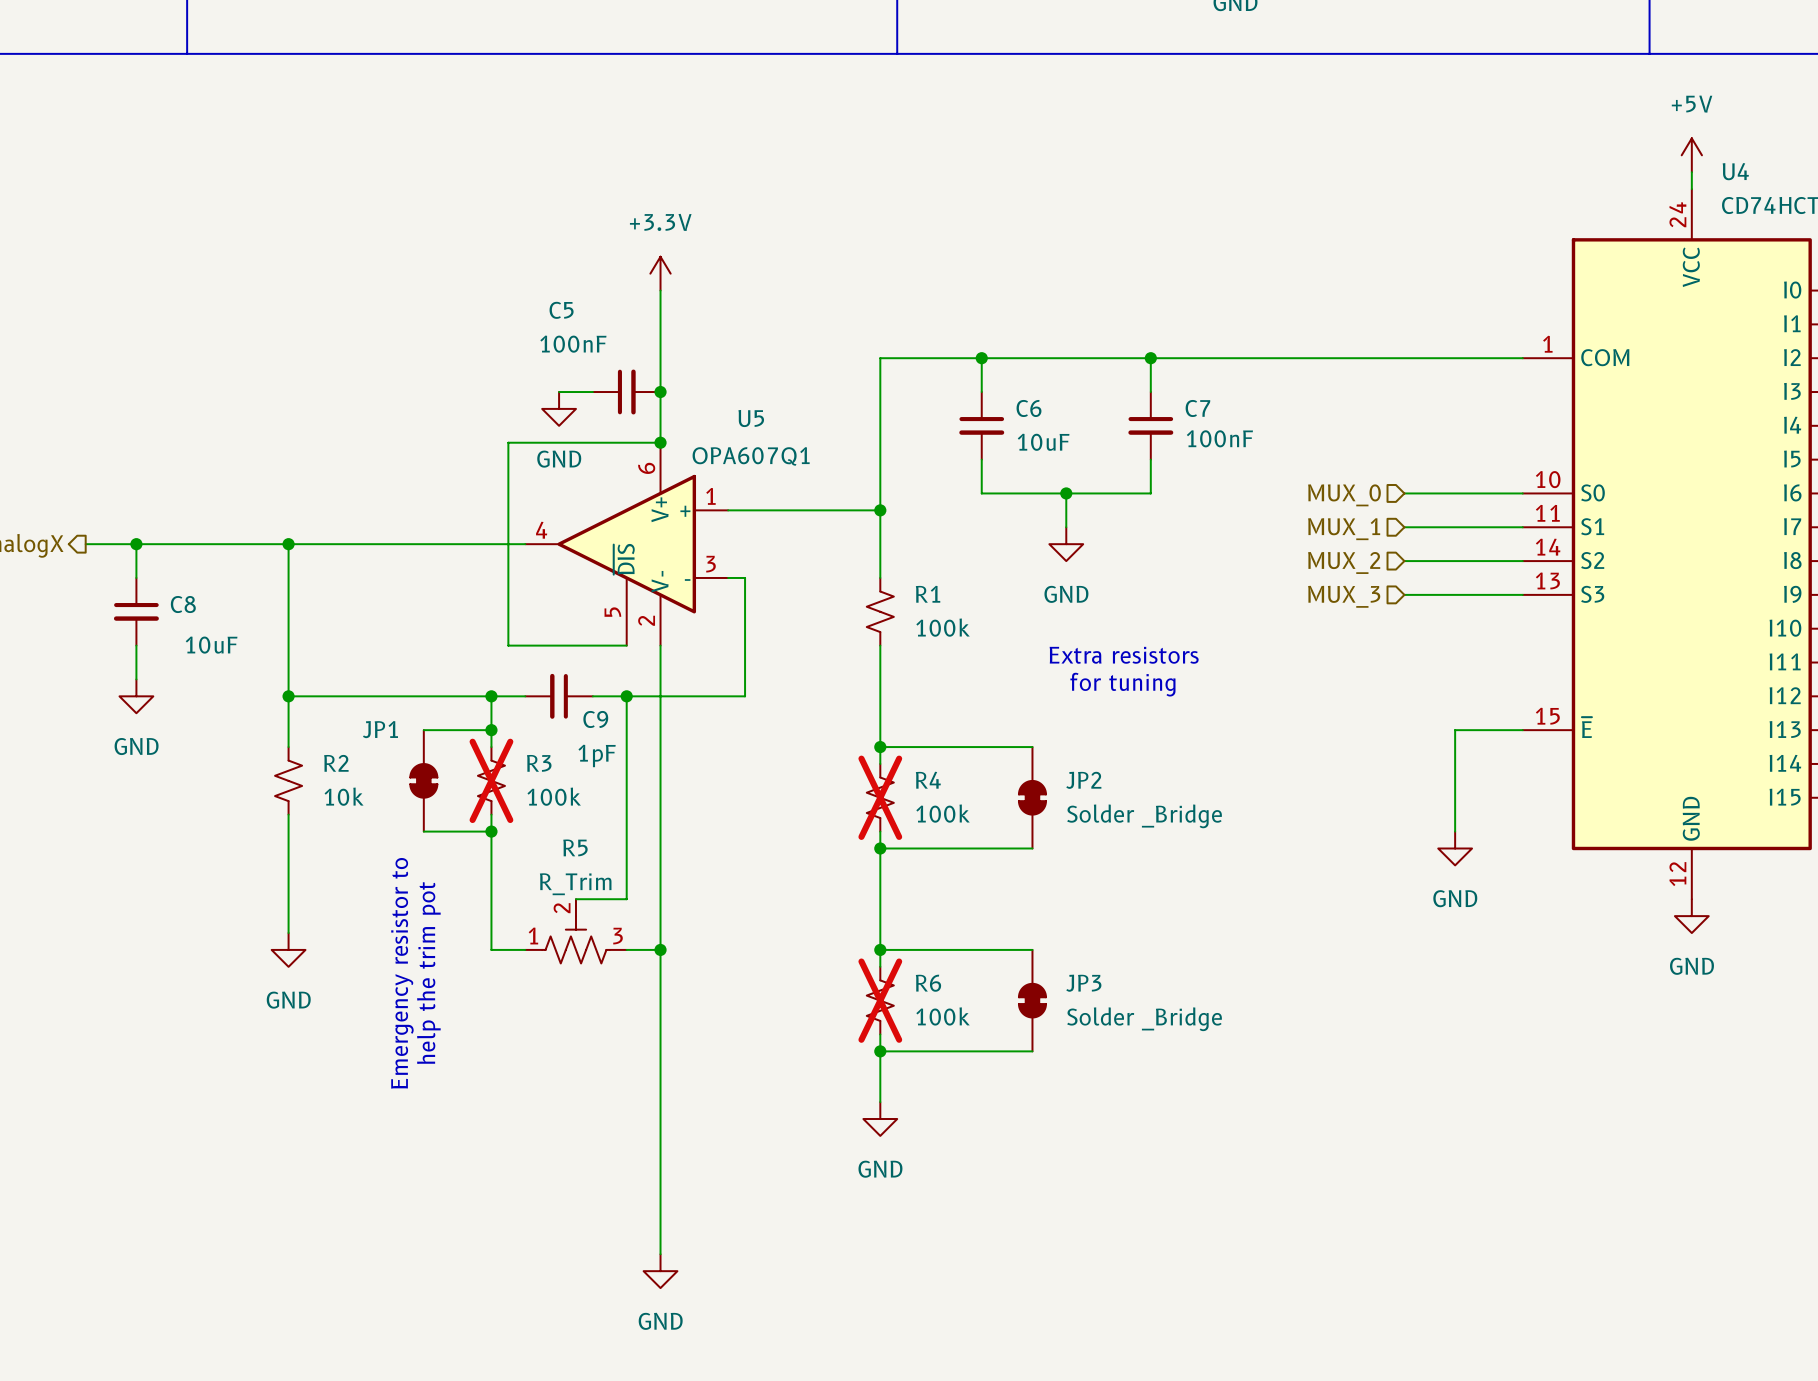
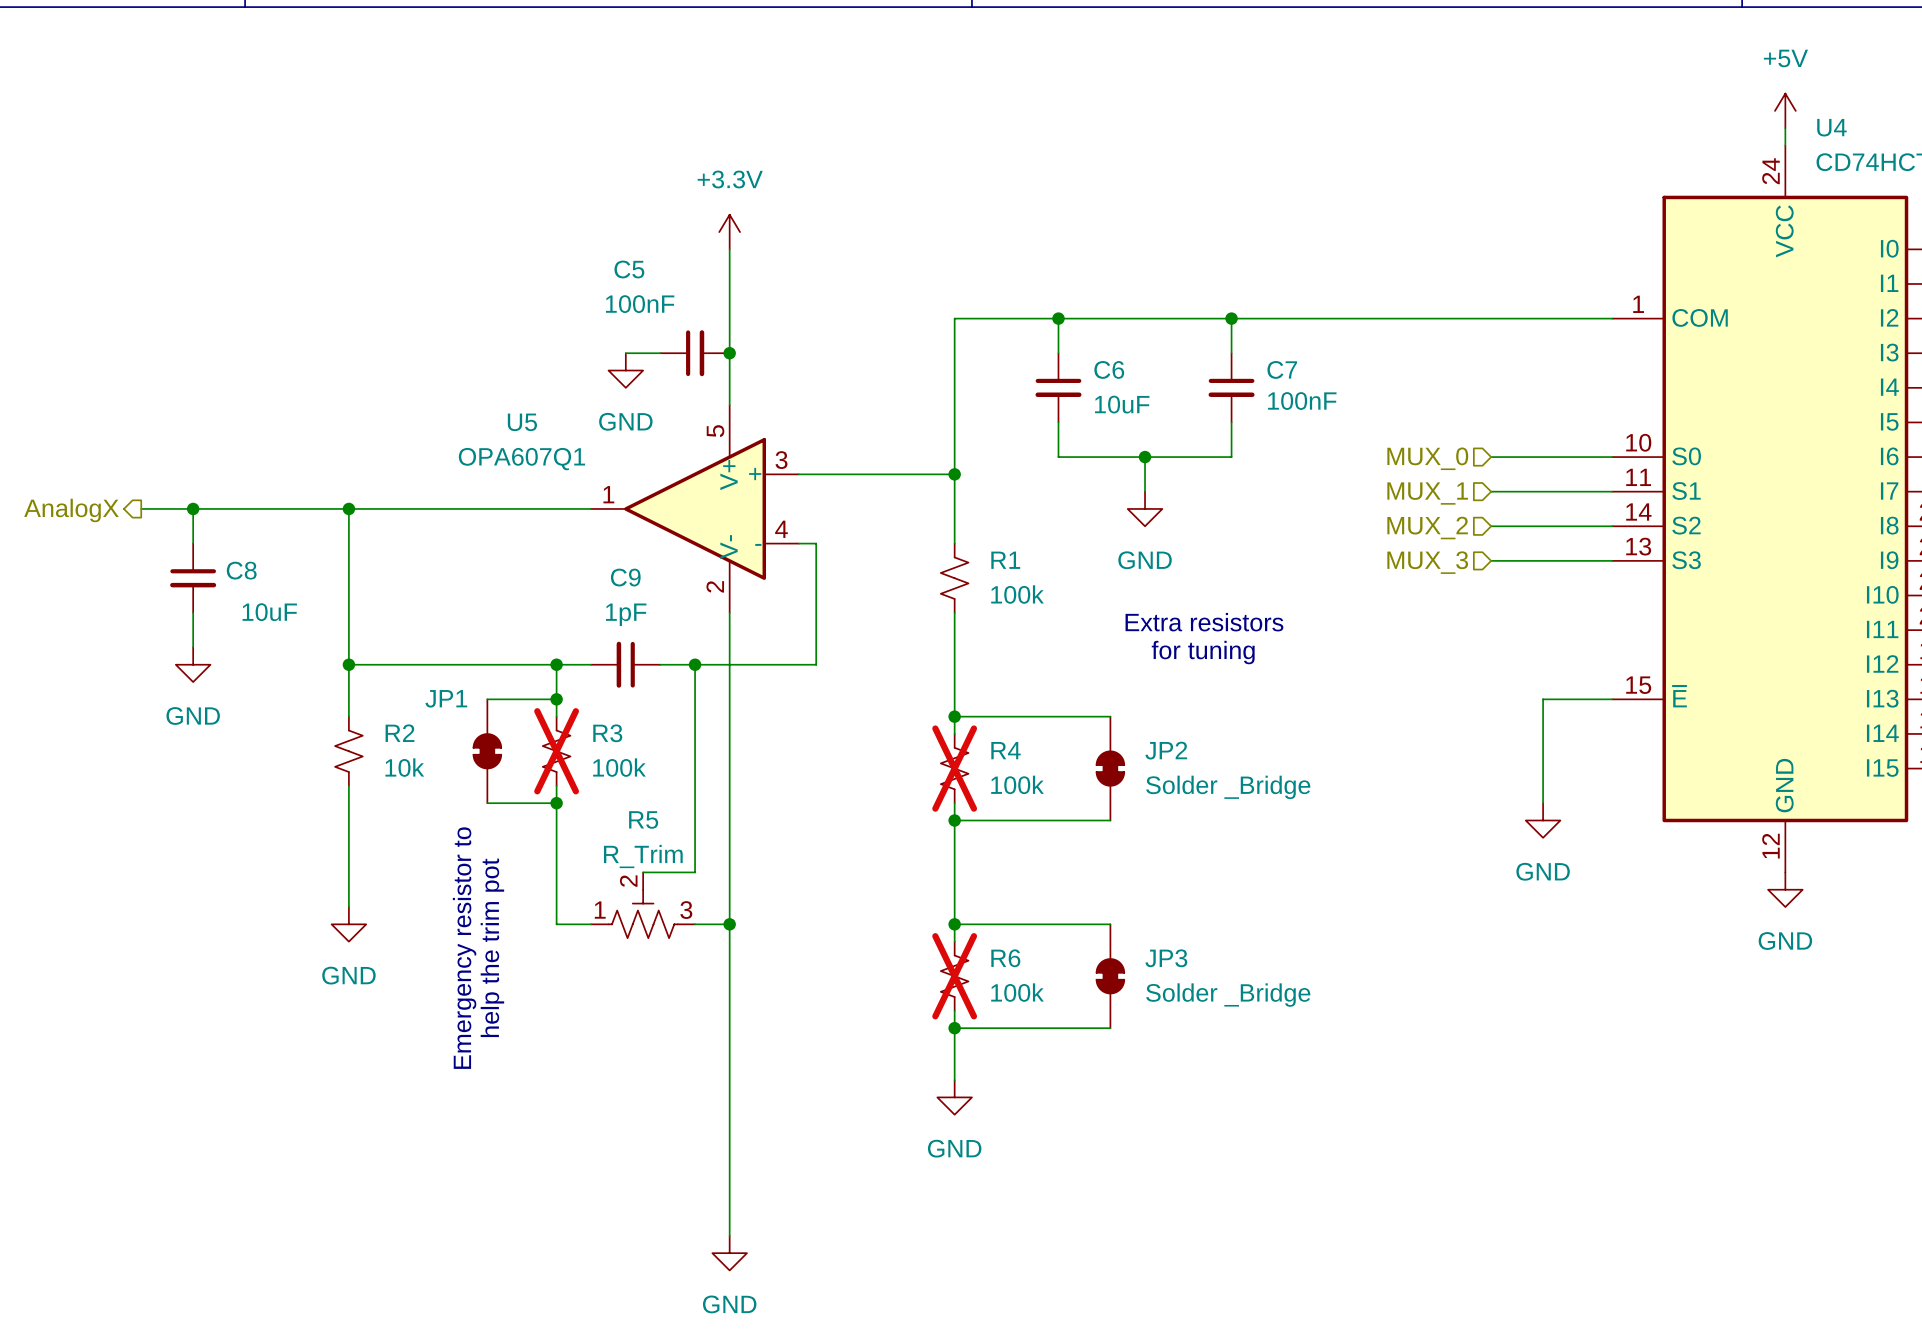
U5 name position: U5 (751, 418) -> U5 (522, 422)
U5 symbol: [525, 442, 729, 646] -> [591, 405, 799, 613]
wire: (660, 442) (508, 442) (508, 645) (626, 645) -> none
junction: (660, 442) -> none
U5 value position: OPA607Q1 (751, 456) -> OPA607Q1 (521, 459)
C9 name position: C9 (595, 719) -> C9 (625, 577)
C9 value position: 1pF (597, 755) -> 1pF (626, 614)

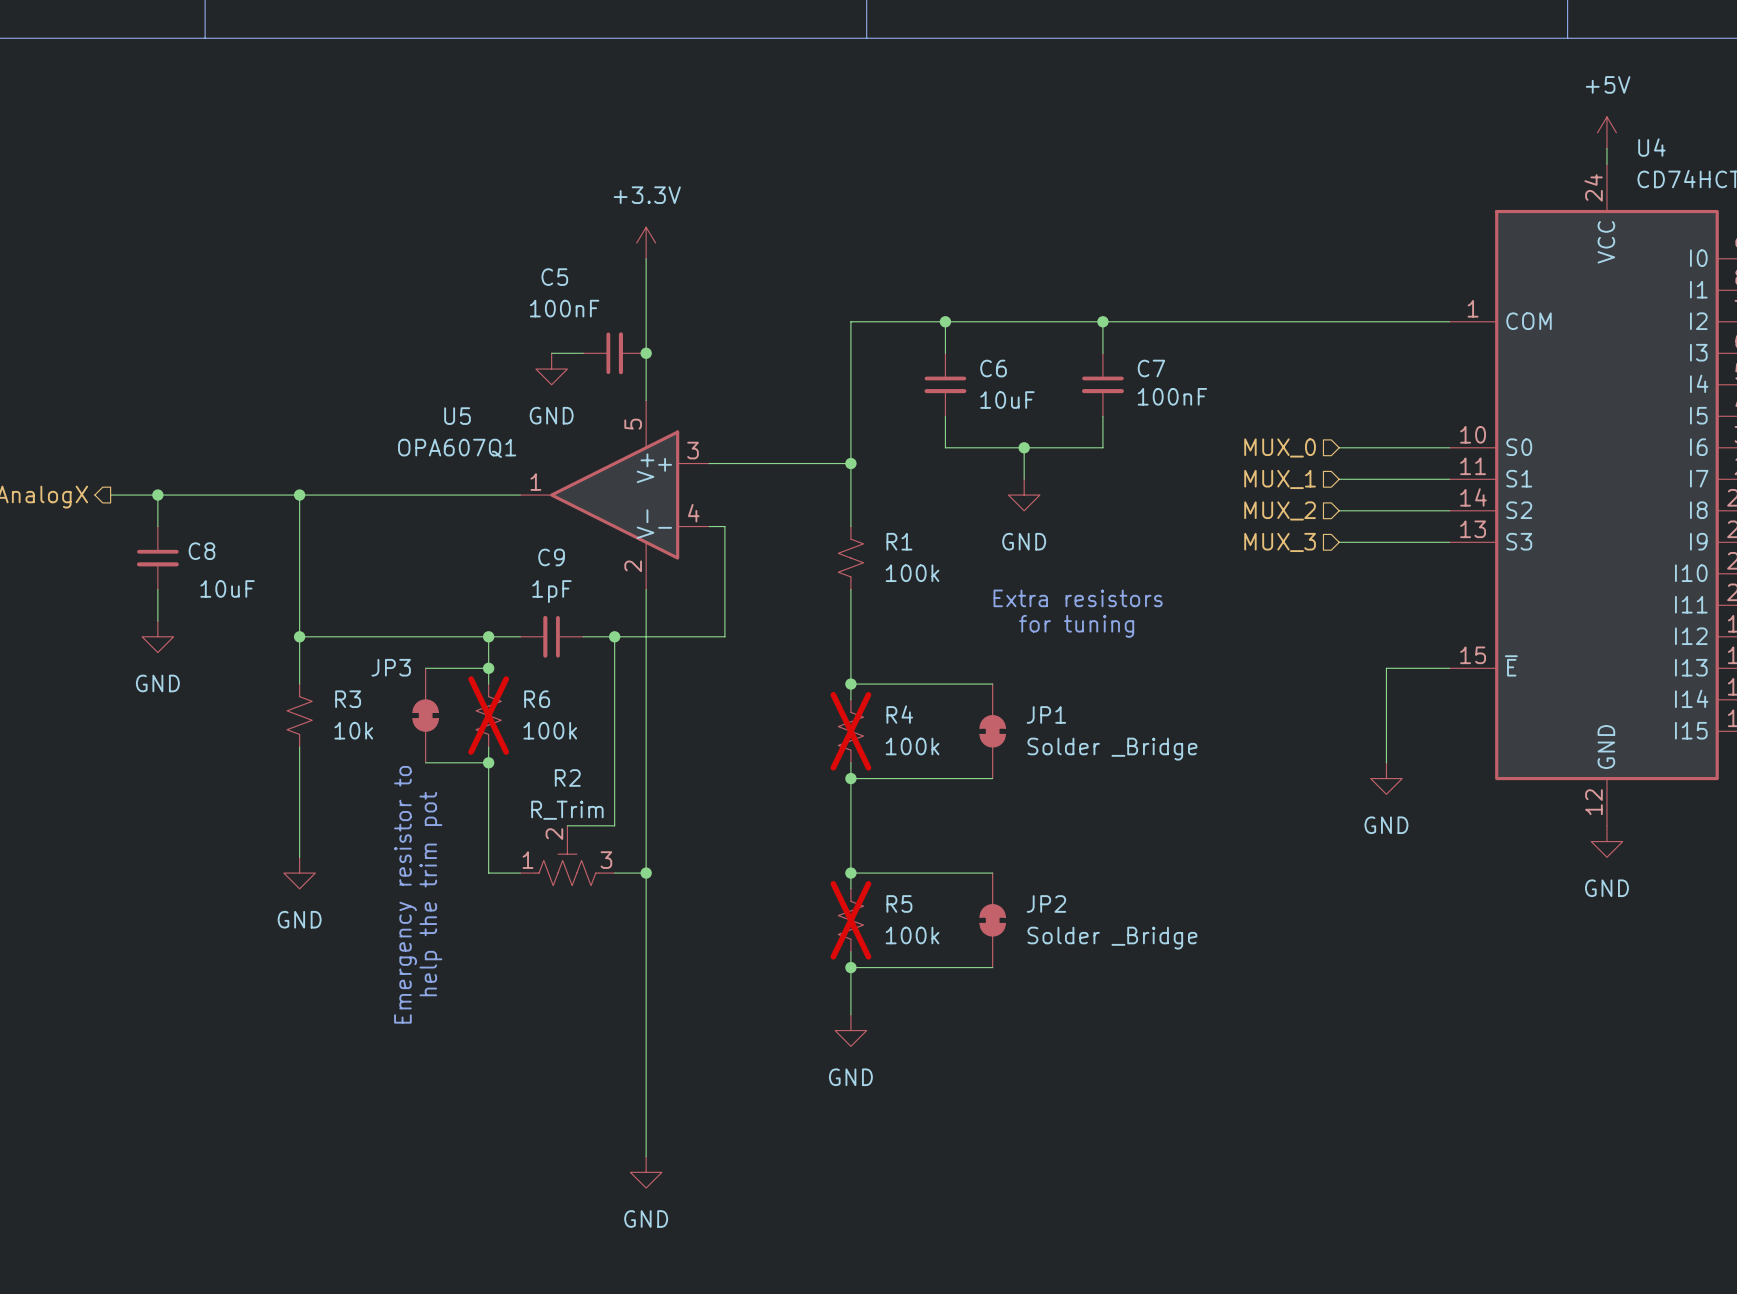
JP1 name: JP1 (446, 698) -> JP3 (391, 667)
R2 name: R2 (400, 733) -> R3 (348, 699)
R3 name: R3 (607, 733) -> R6 (537, 699)
JP2 name: JP2 (1166, 750) -> JP1 (1046, 714)
R5 name: R5 (643, 819) -> R2 (567, 777)
R6 name: R6 (1005, 958) -> R5 (899, 903)
JP3 name: JP3 (1166, 958) -> JP2 (1046, 903)

